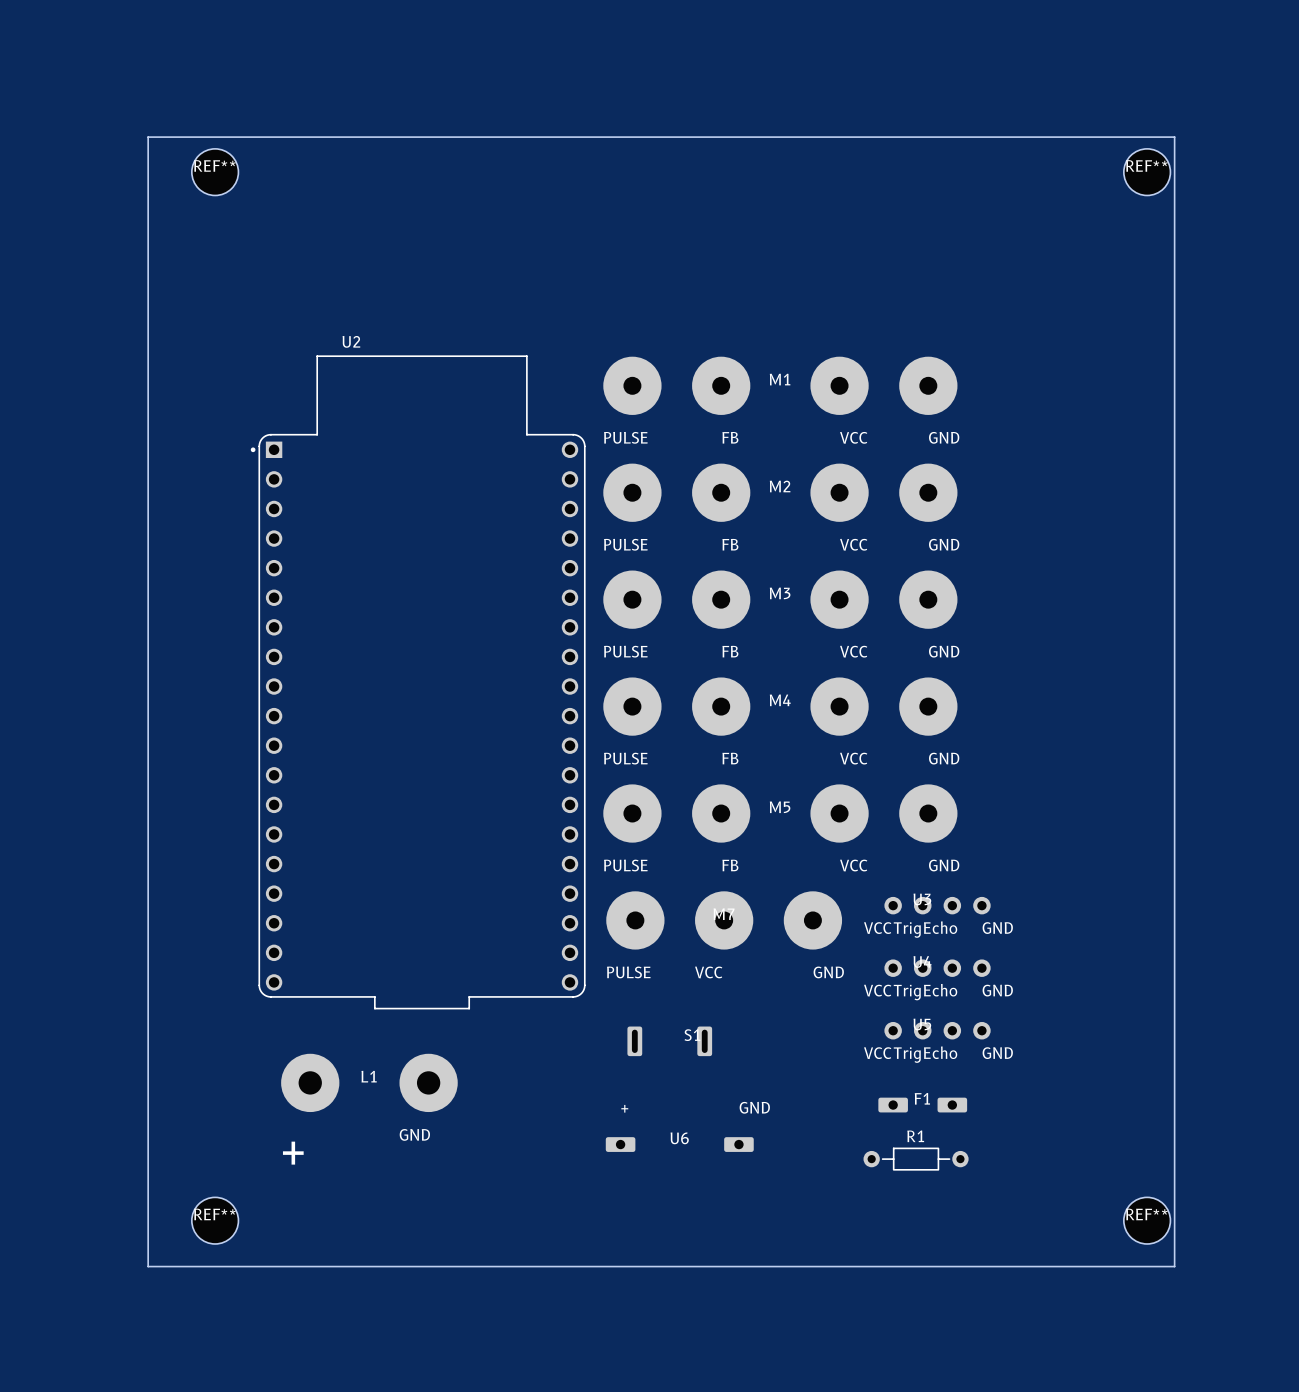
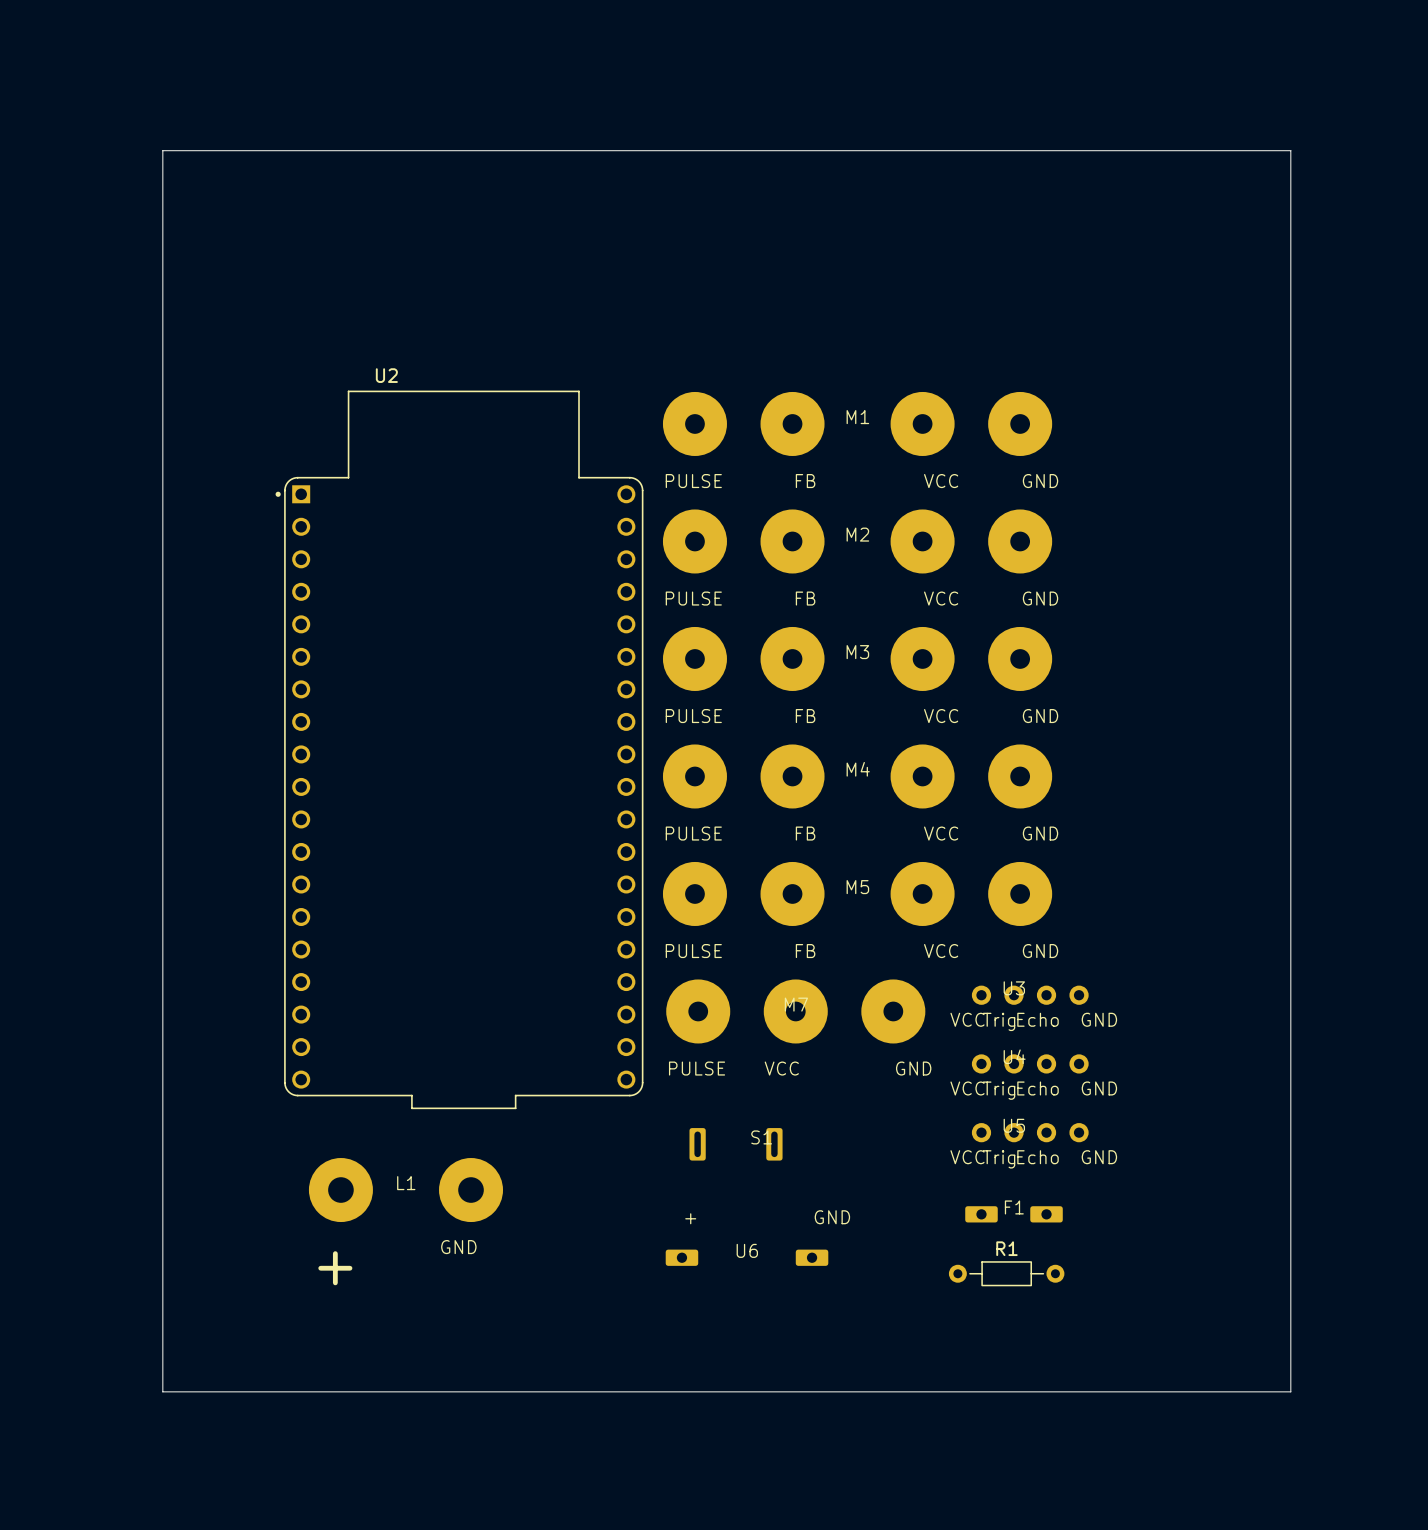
REF**: (215, 172) -> none
REF**: (1147, 172) -> none
REF**: (215, 1220) -> none
REF**: (1147, 1220) -> none

